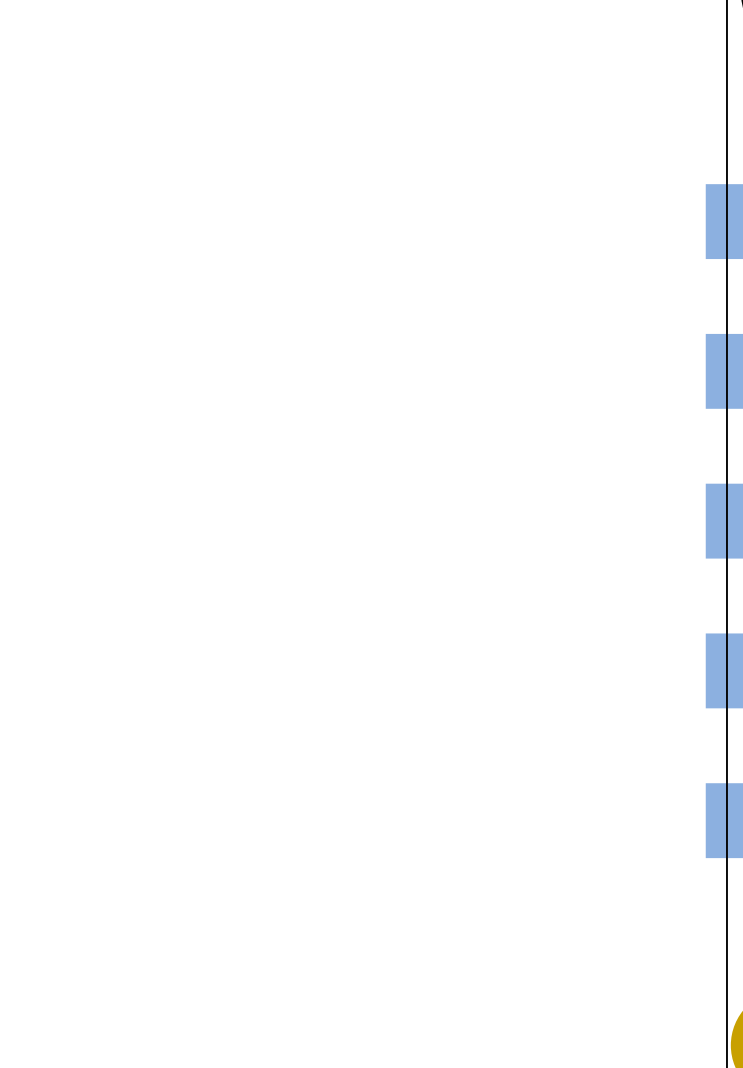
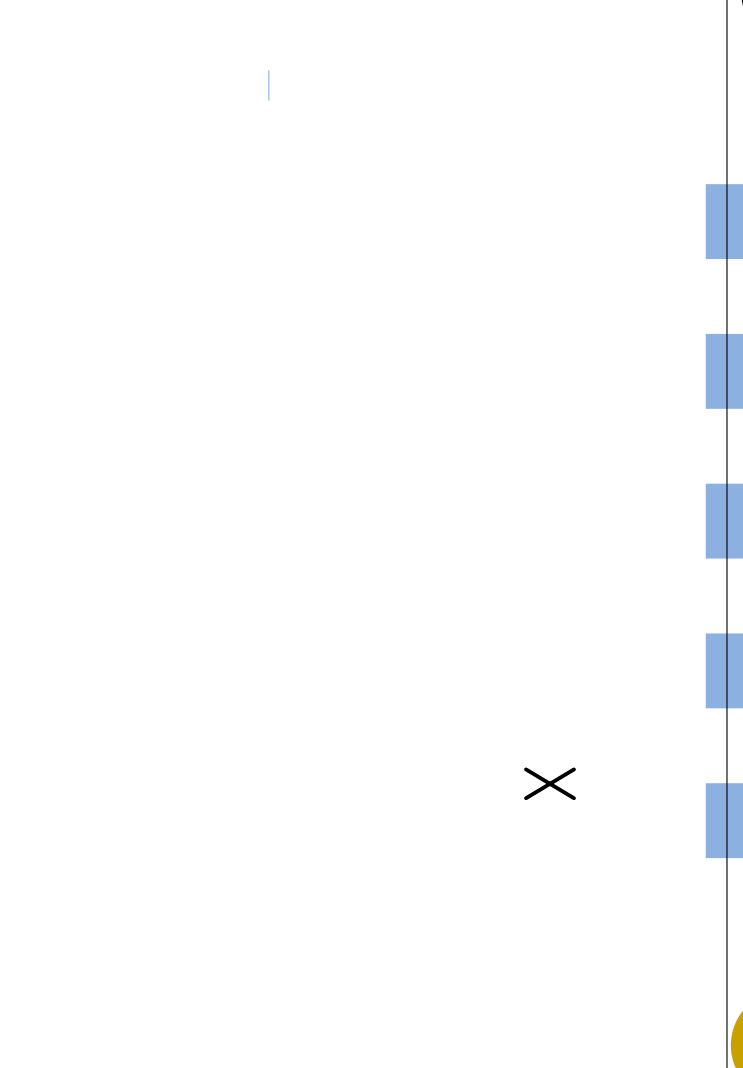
track: none -> (268, 70) (268, 100)
text: none -> X (550, 783)

